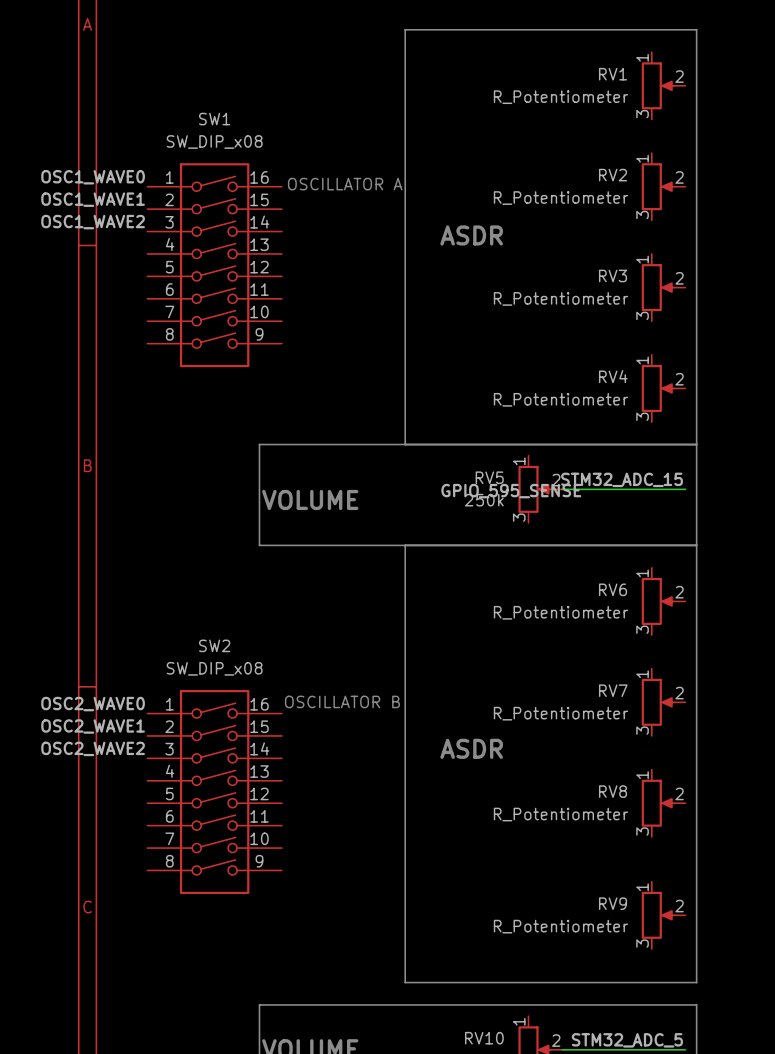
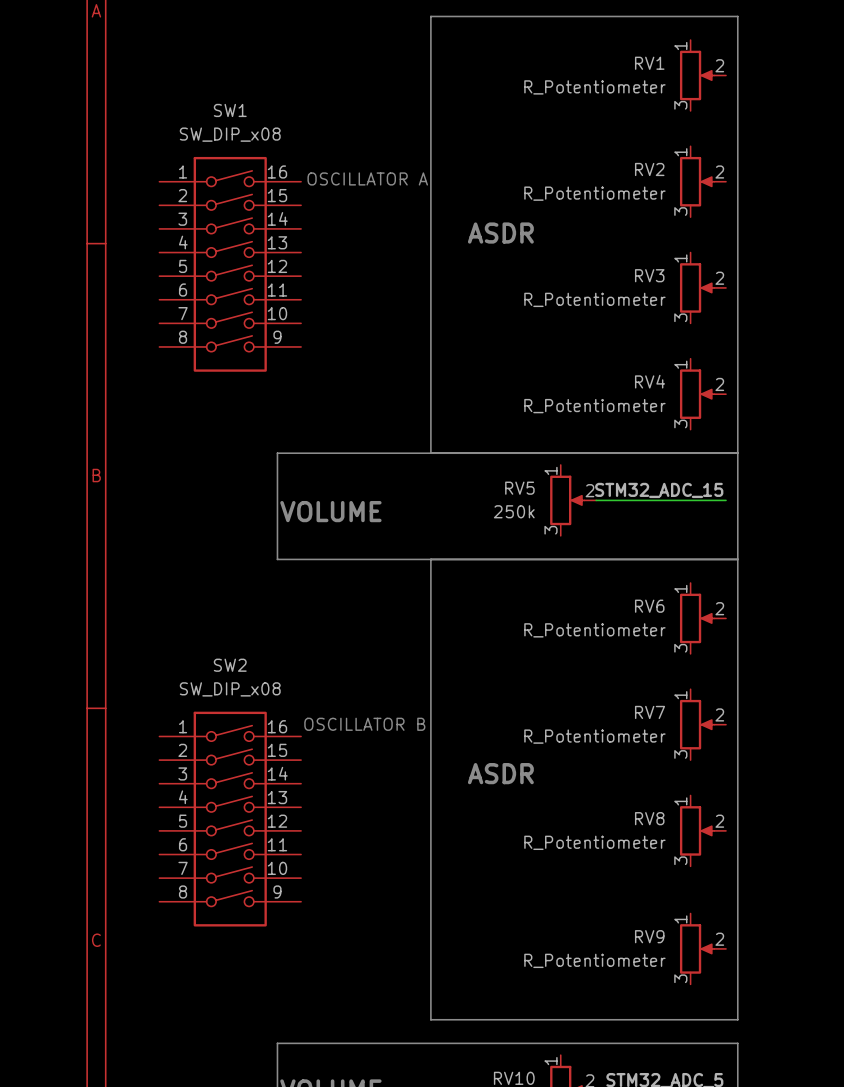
label: OSC1_WAVE0 (93, 177) -> none
label: OSC1_WAVE1 (93, 199) -> none
label: OSC1_WAVE2 (93, 222) -> none
label: GPIO_595_SENSE (511, 491) -> none
label: OSC2_WAVE0 (93, 704) -> none
label: OSC2_WAVE1 (93, 726) -> none
label: OSC2_WAVE2 (93, 748) -> none

